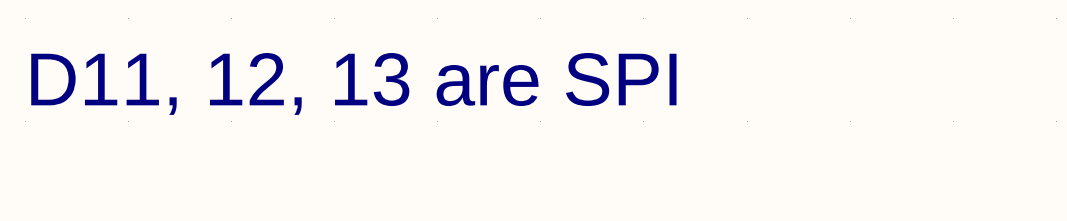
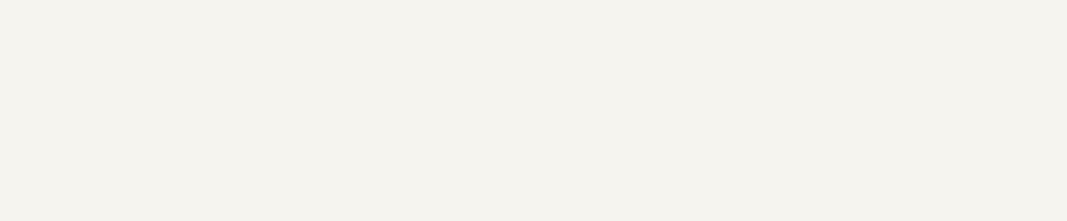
text: D11, 12, 13 are SPI (353, 83) -> none

